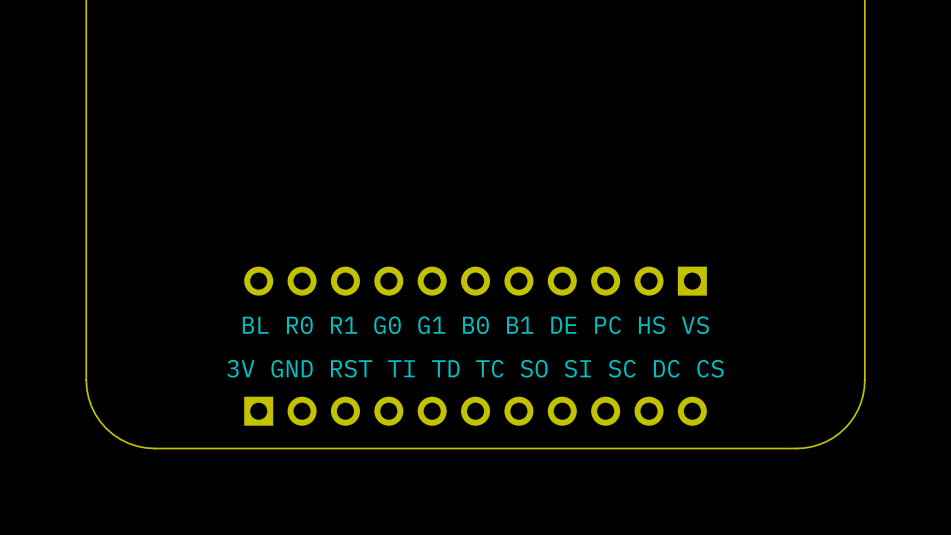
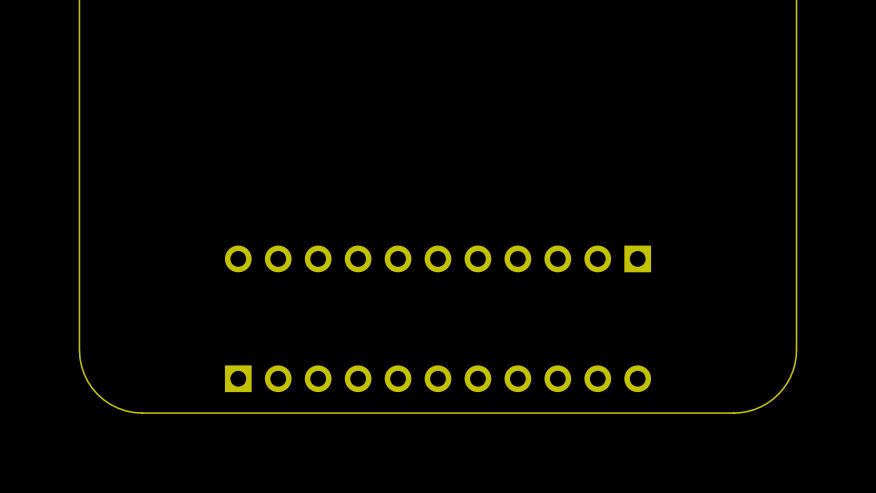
text: BL R0 R1 G0 G1 B0 B1 DE PC HS VS (475, 325) -> none
text: 3V GND RST TI TD TC SO SI SC DC CS (475, 368) -> none

